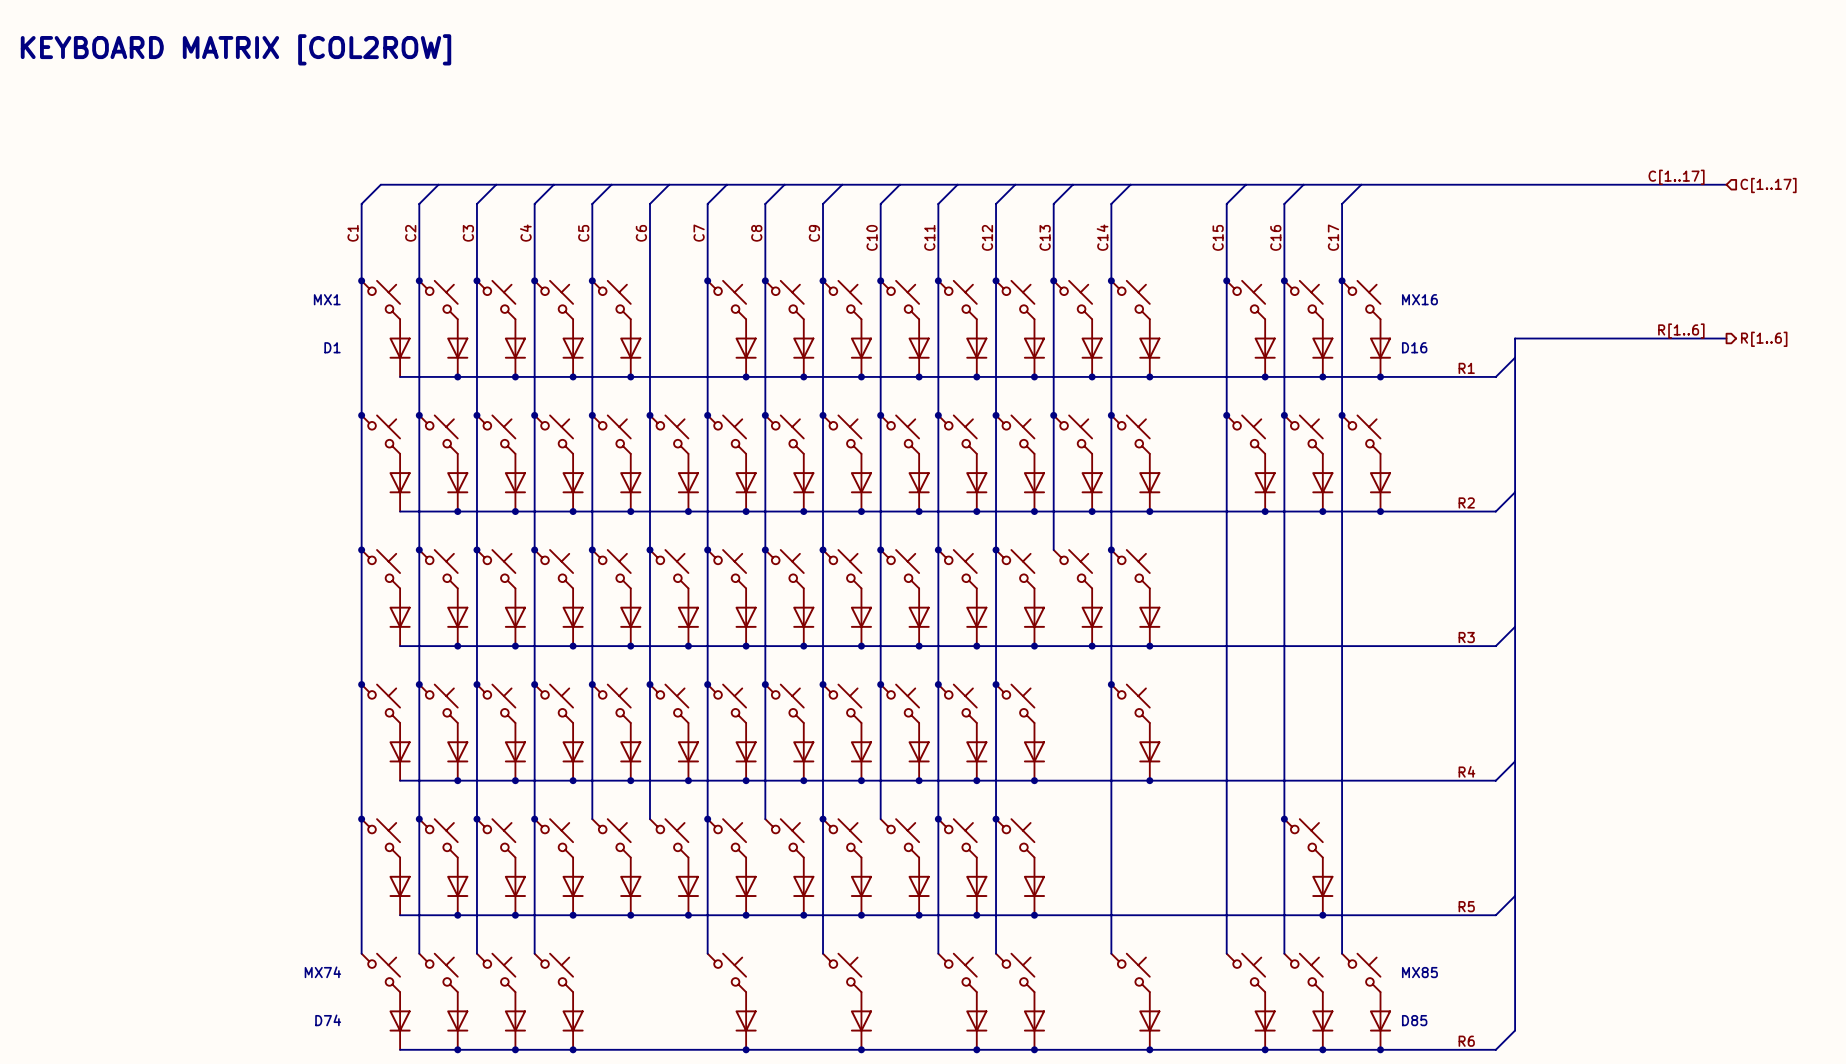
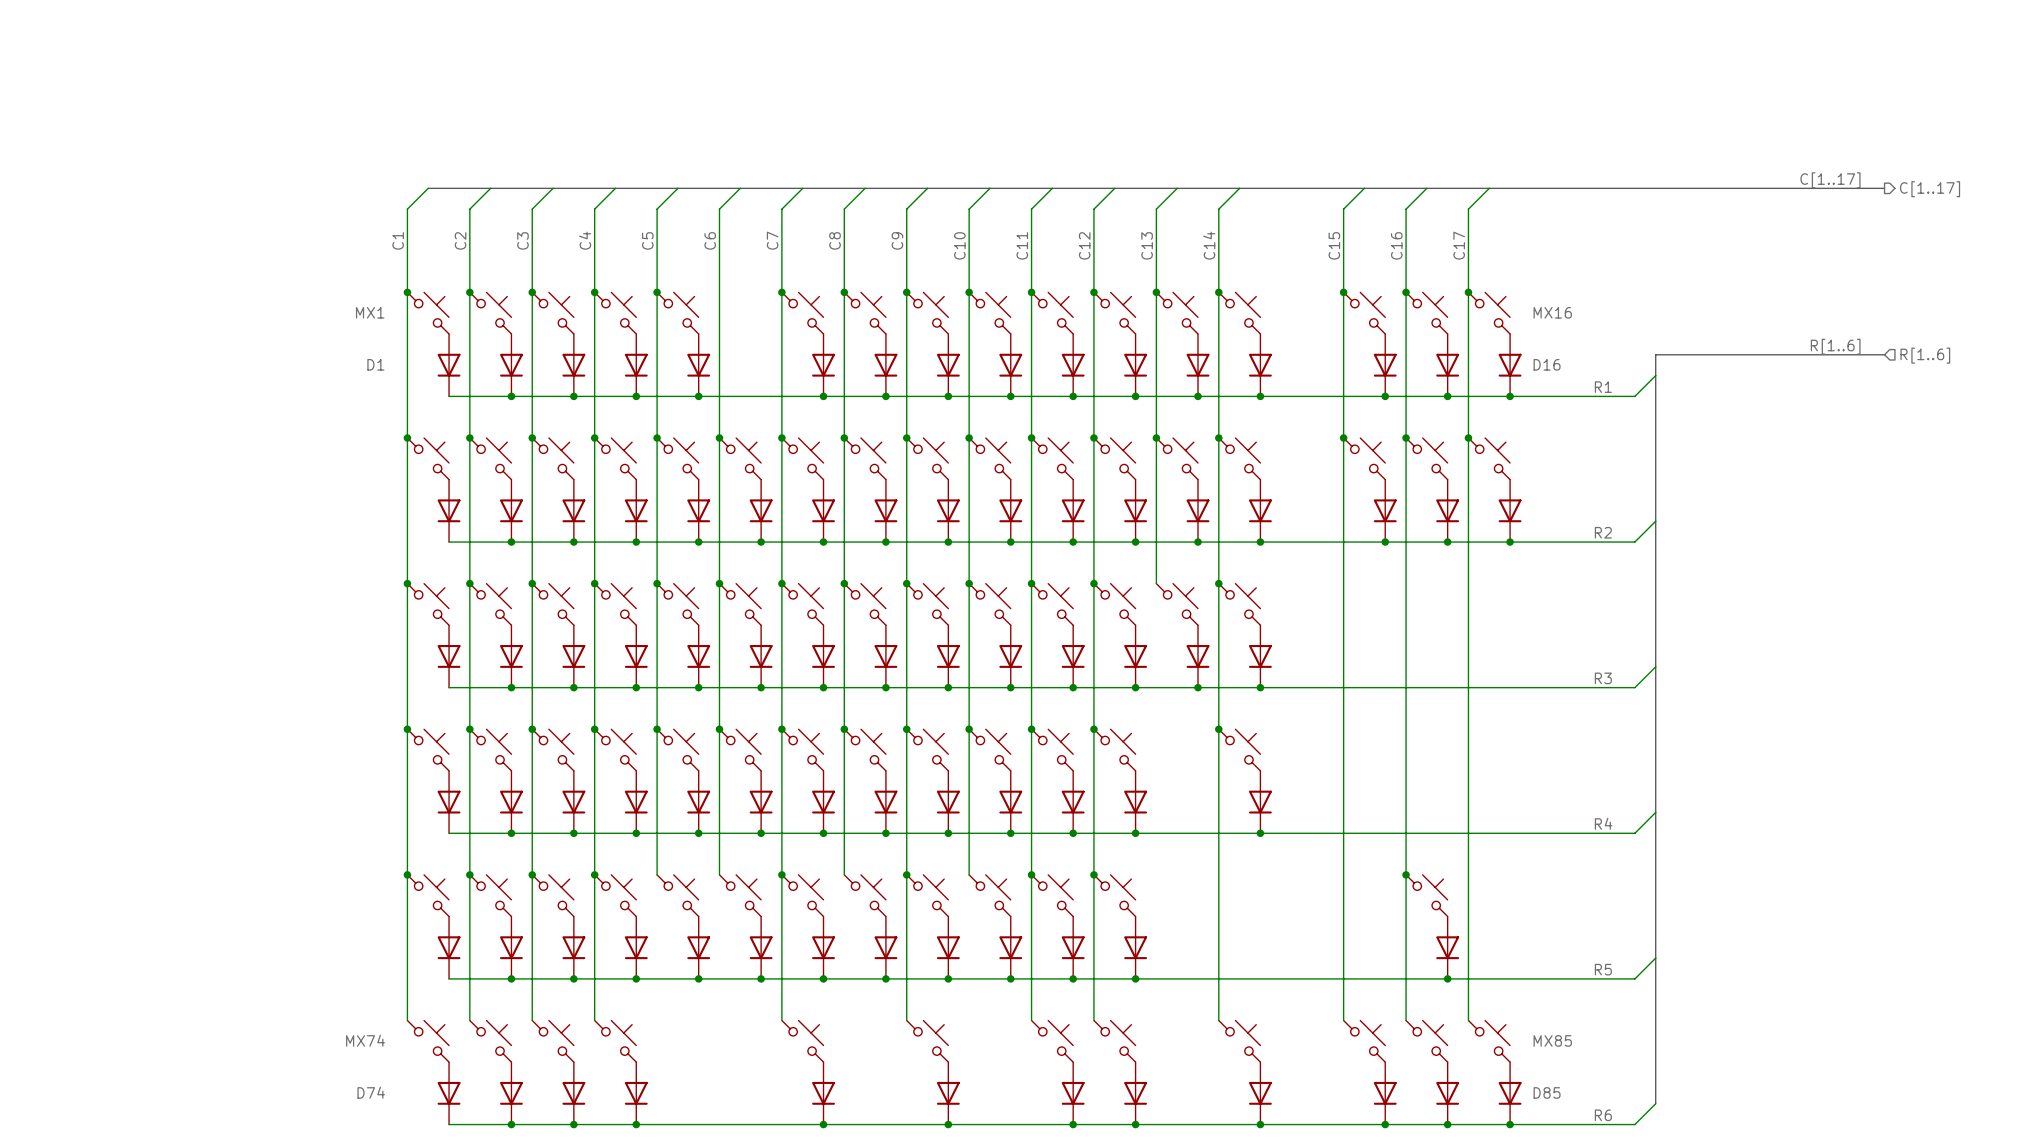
text: KEYBOARD MATRIX [COL2ROW] (236, 49) -> none
hierarchical label shape: input (1768, 185) -> output (1930, 189)
hierarchical label shape: output (1764, 339) -> input (1925, 355)

